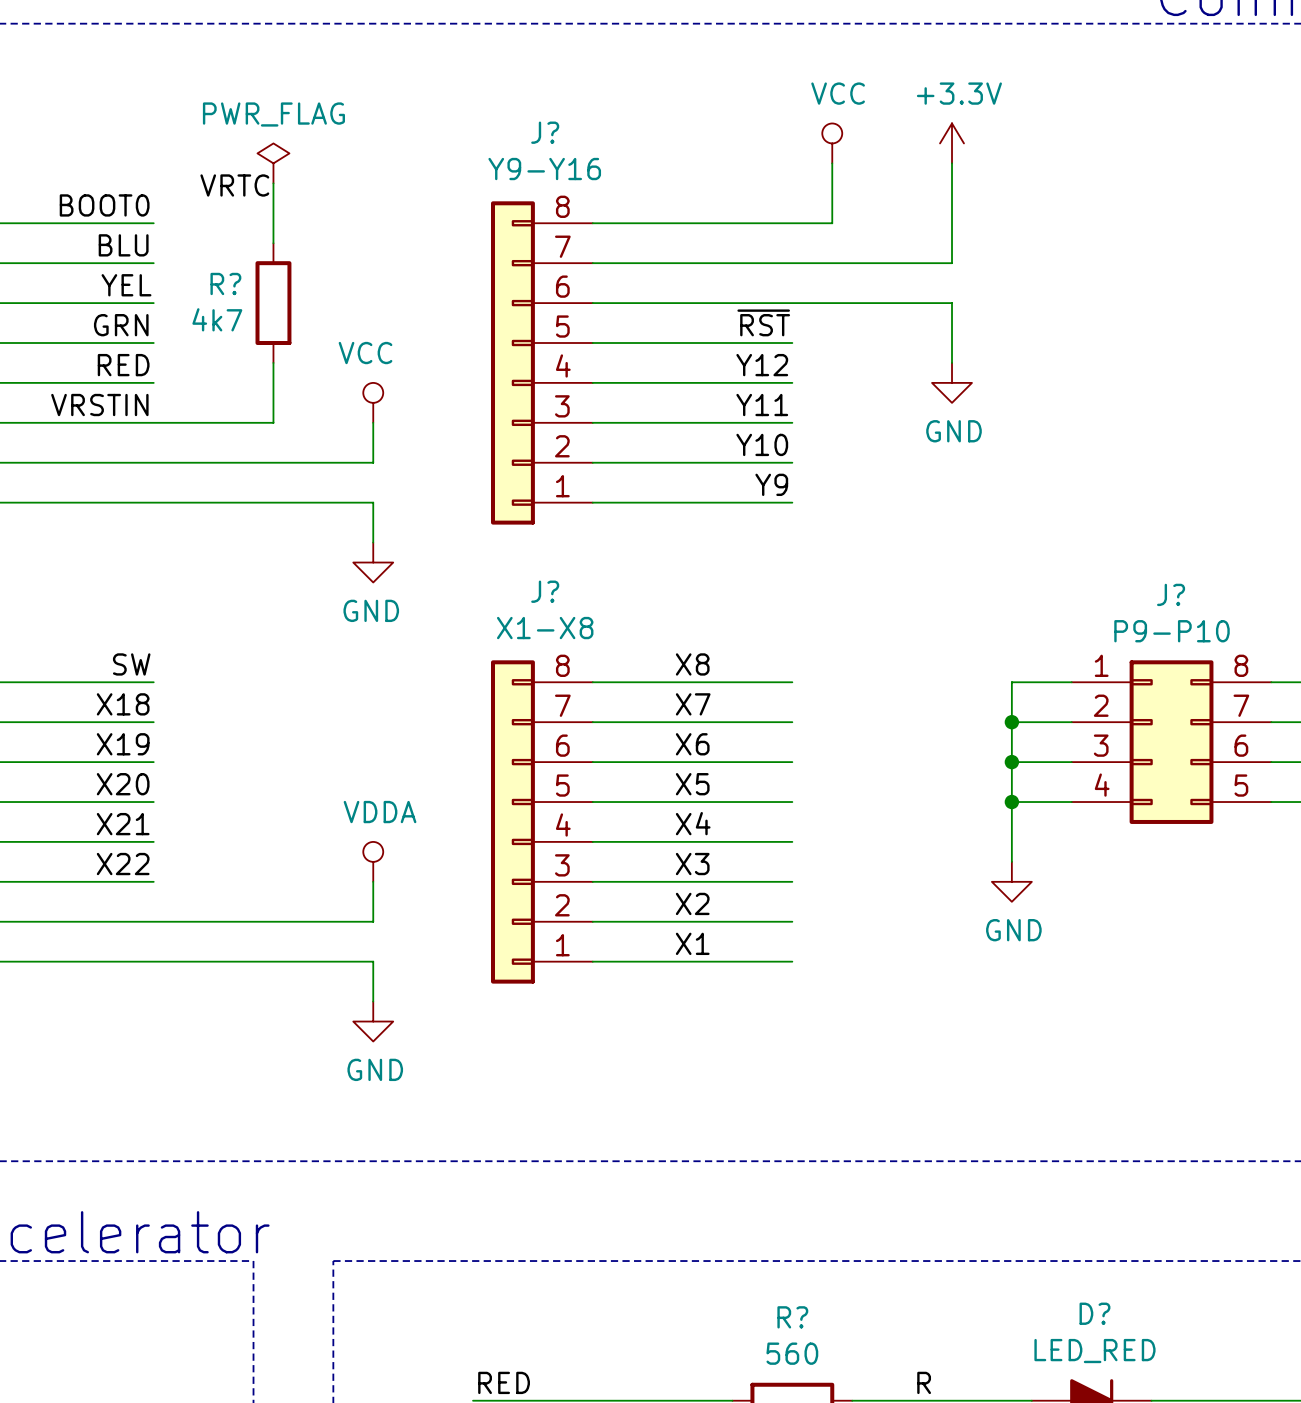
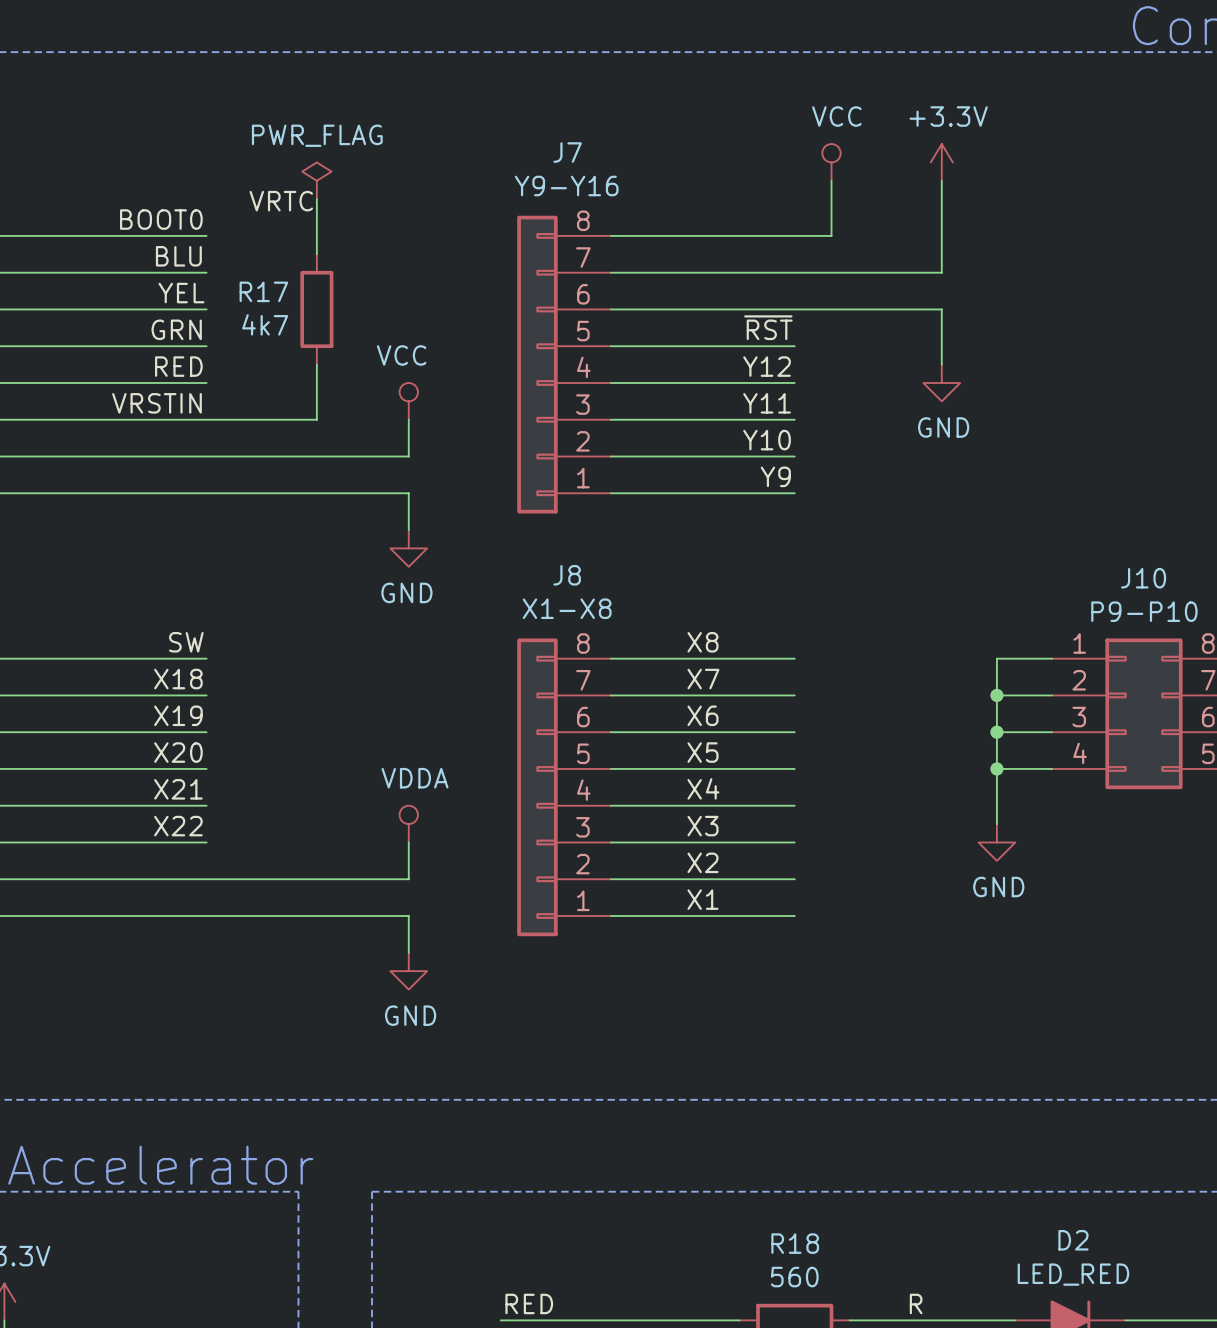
J? name: J? (545, 132) -> J7 (567, 152)
R? name: R? (225, 283) -> R17 (263, 291)
J? name: J? (545, 591) -> J8 (567, 575)
J? name: J? (1171, 594) -> J10 (1143, 578)
D? name: D? (1094, 1313) -> D2 (1073, 1240)
R? name: R? (792, 1317) -> R18 (795, 1243)

